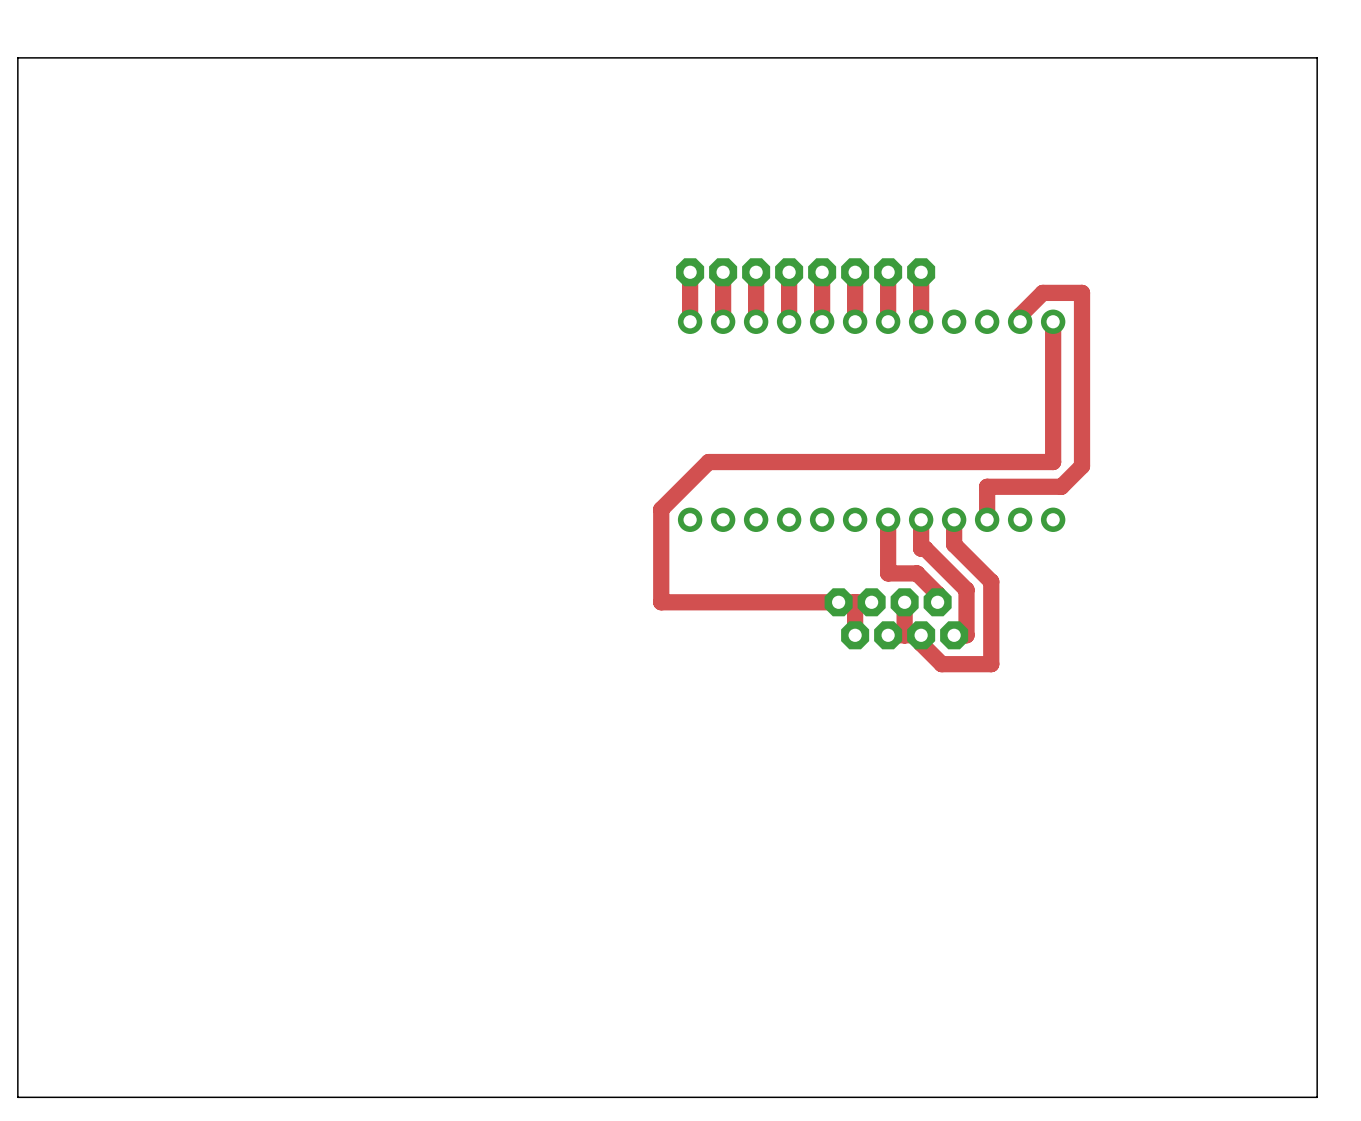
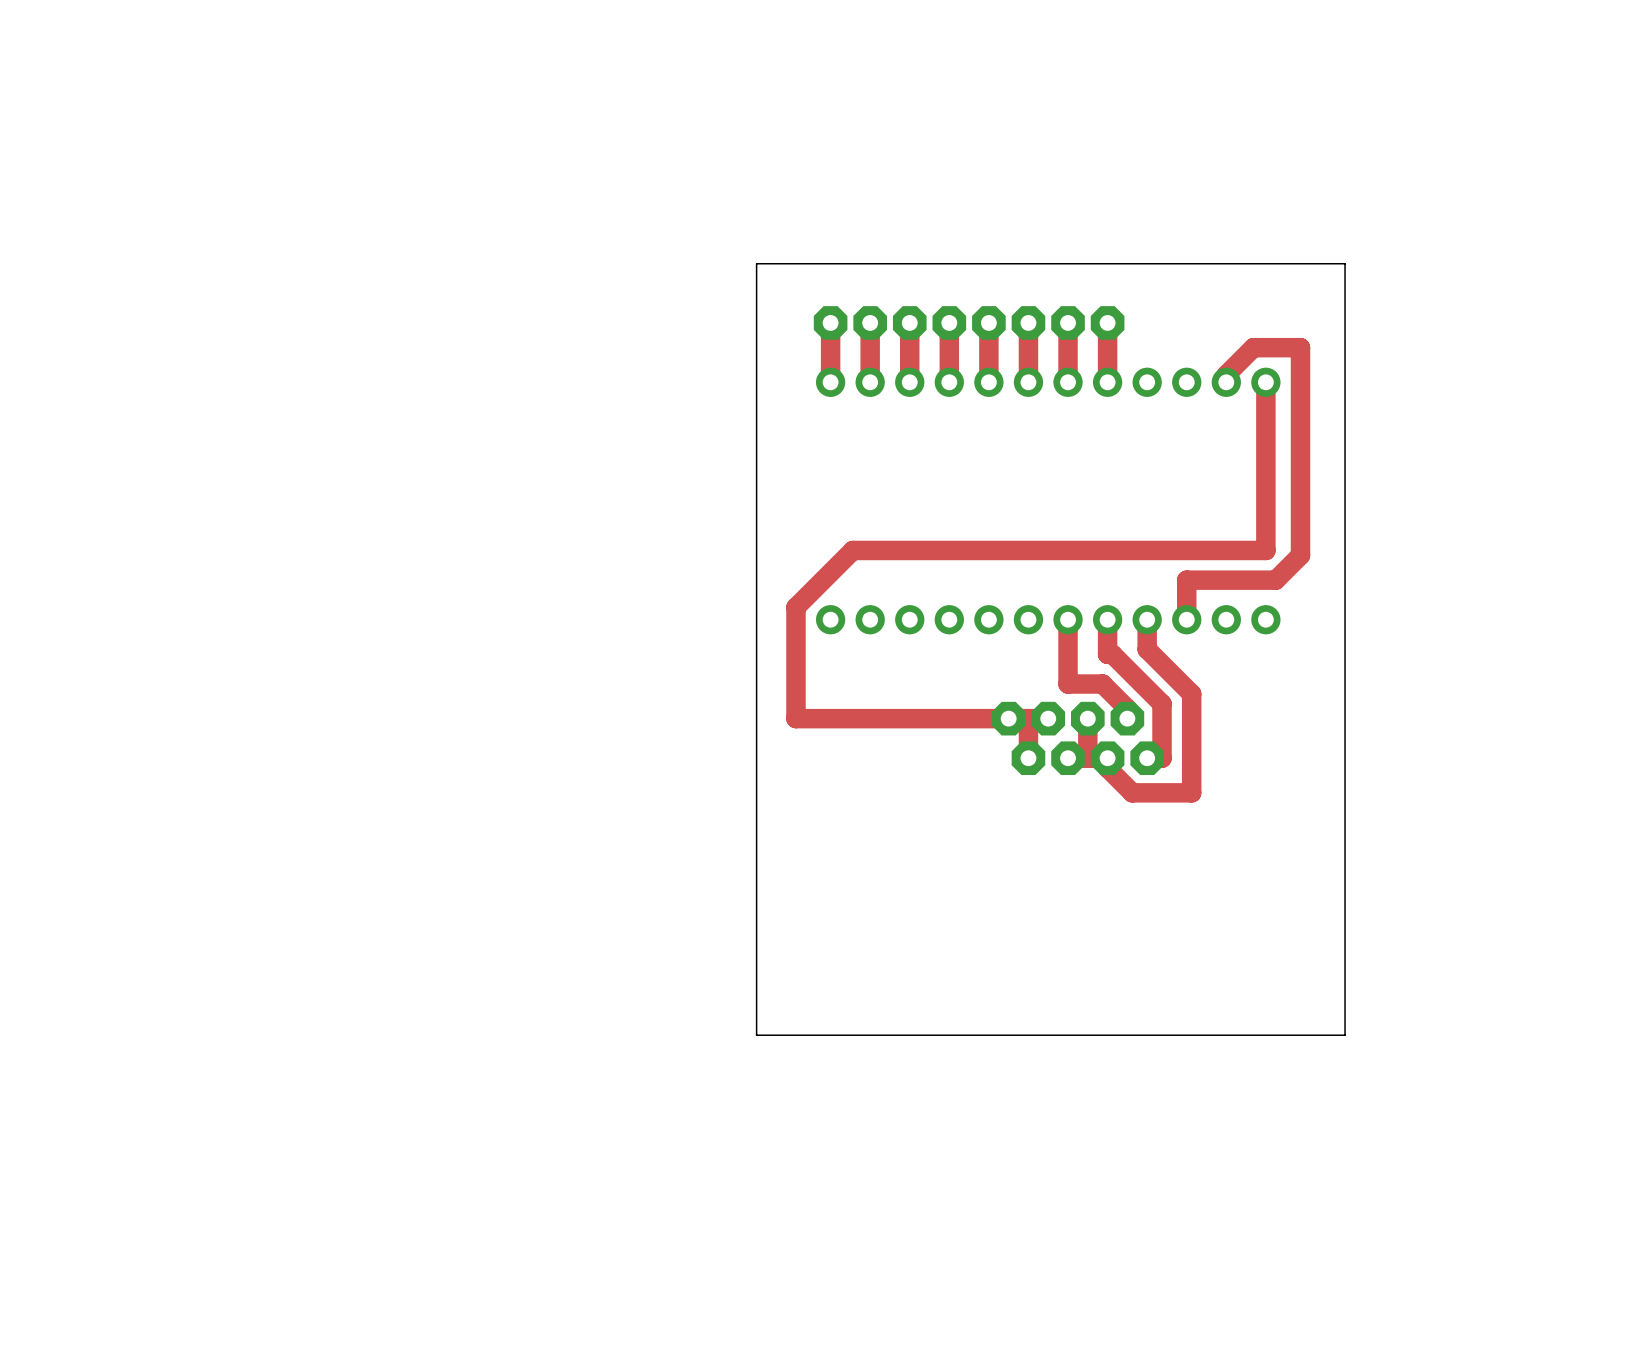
board edge: (1317, 57) (17, 57) (17, 1097) (1317, 1097) (1317, 57) -> none
board edge: none -> (1345, 263) (756, 263) (756, 1035) (1345, 1035) (1345, 263)

